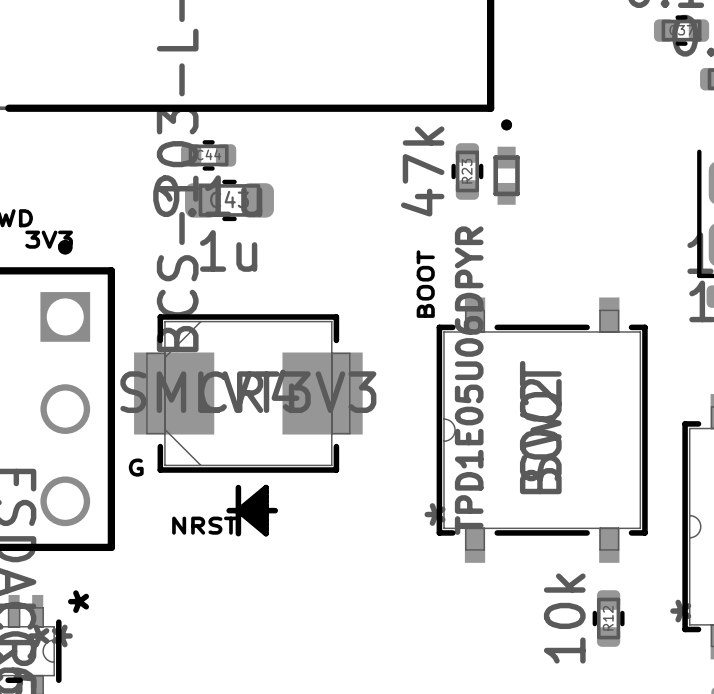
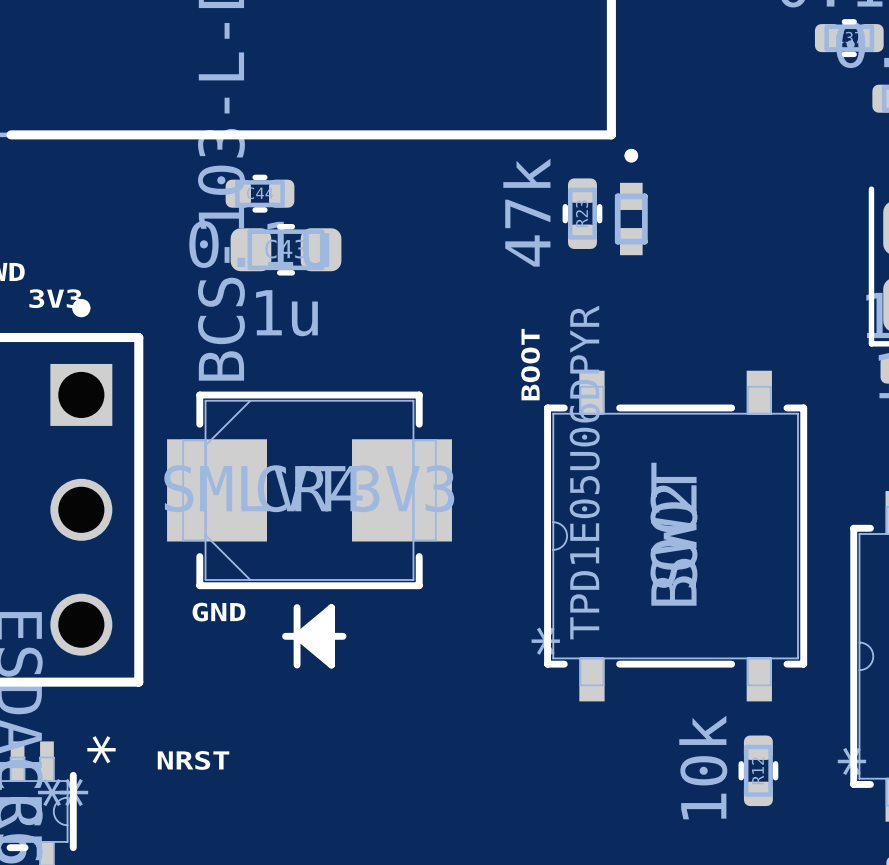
text: G (136, 467) -> none
text: none -> GND (218, 612)
text position: NRST (205, 525) -> NRST (193, 760)

